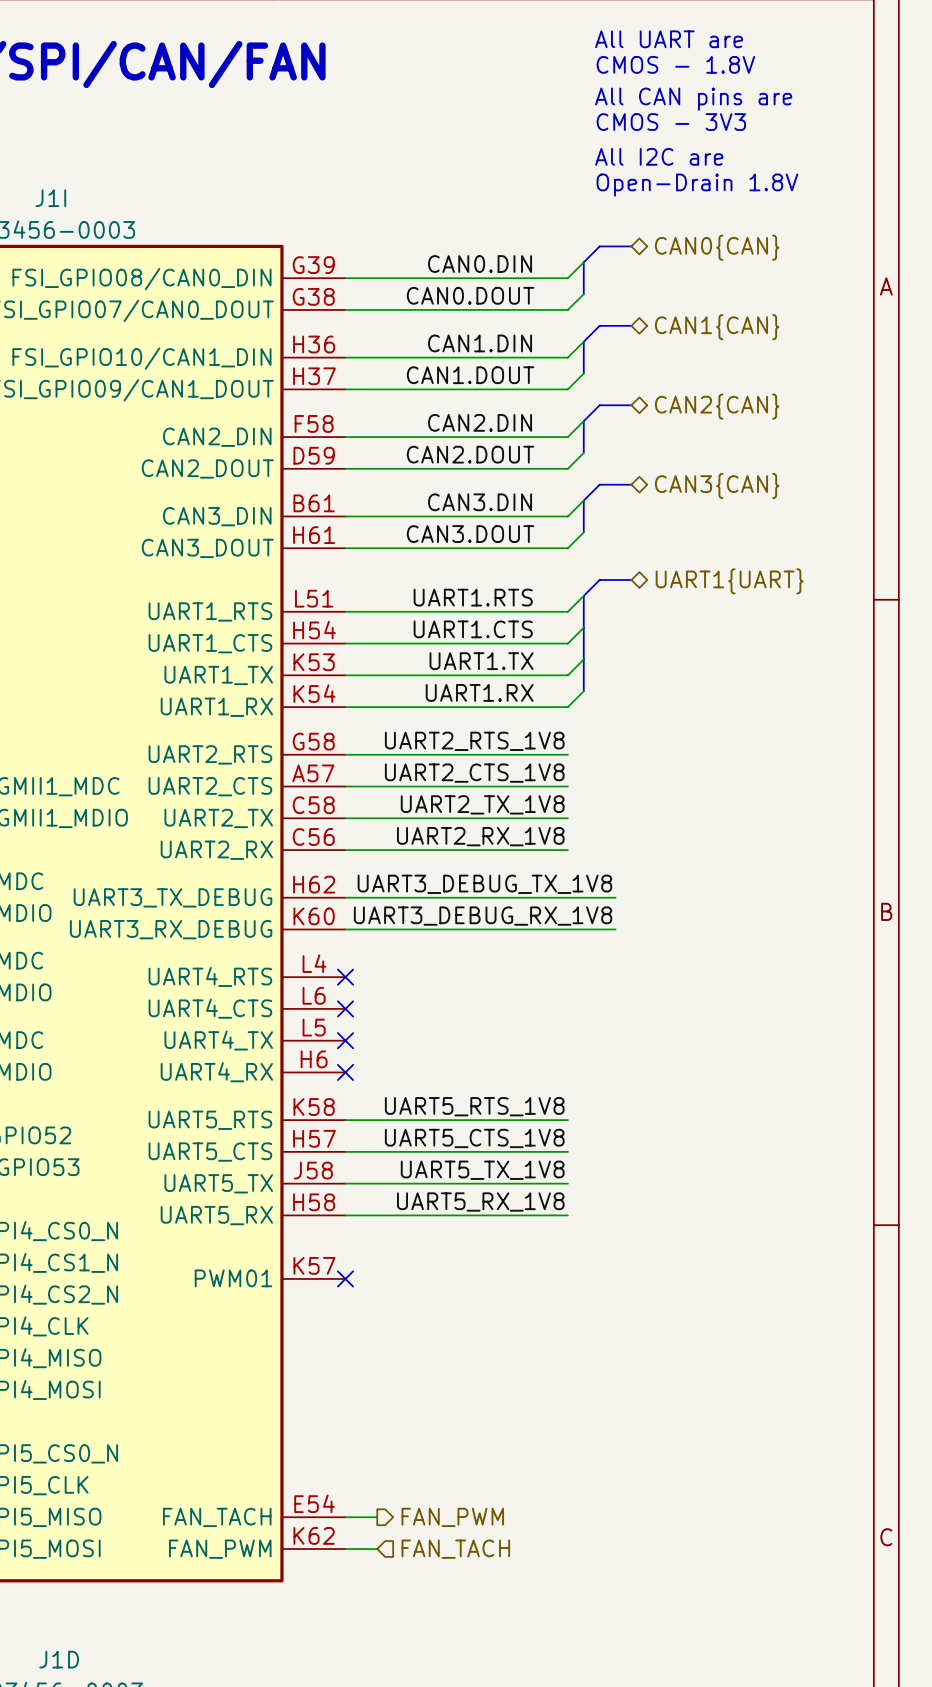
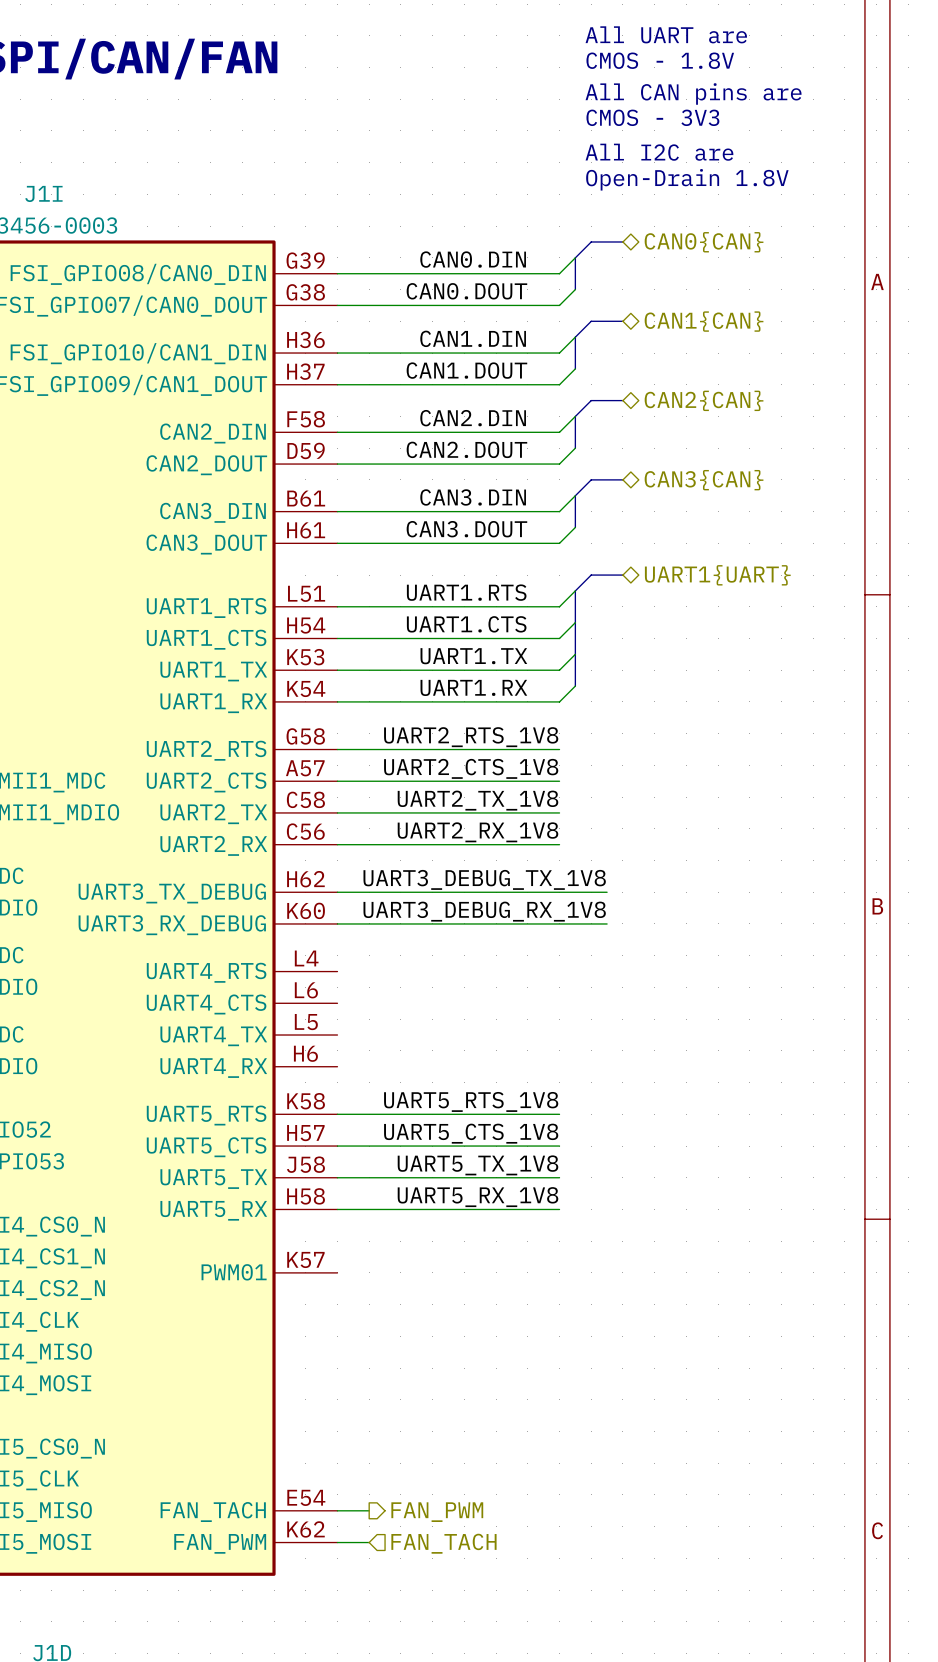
no-connect mark: (345, 977) -> none
no-connect mark: (345, 1008) -> none
no-connect mark: (345, 1040) -> none
no-connect mark: (345, 1072) -> none
no-connect mark: (345, 1278) -> none

